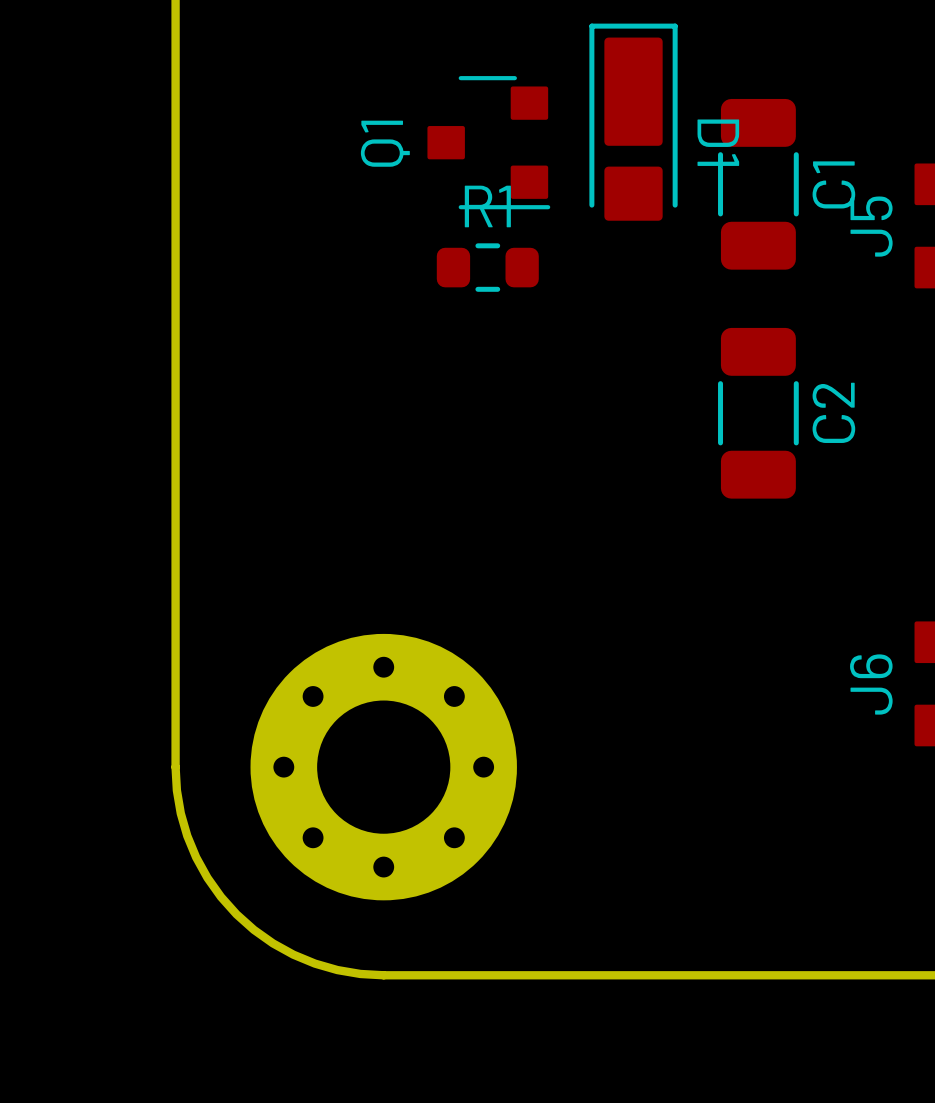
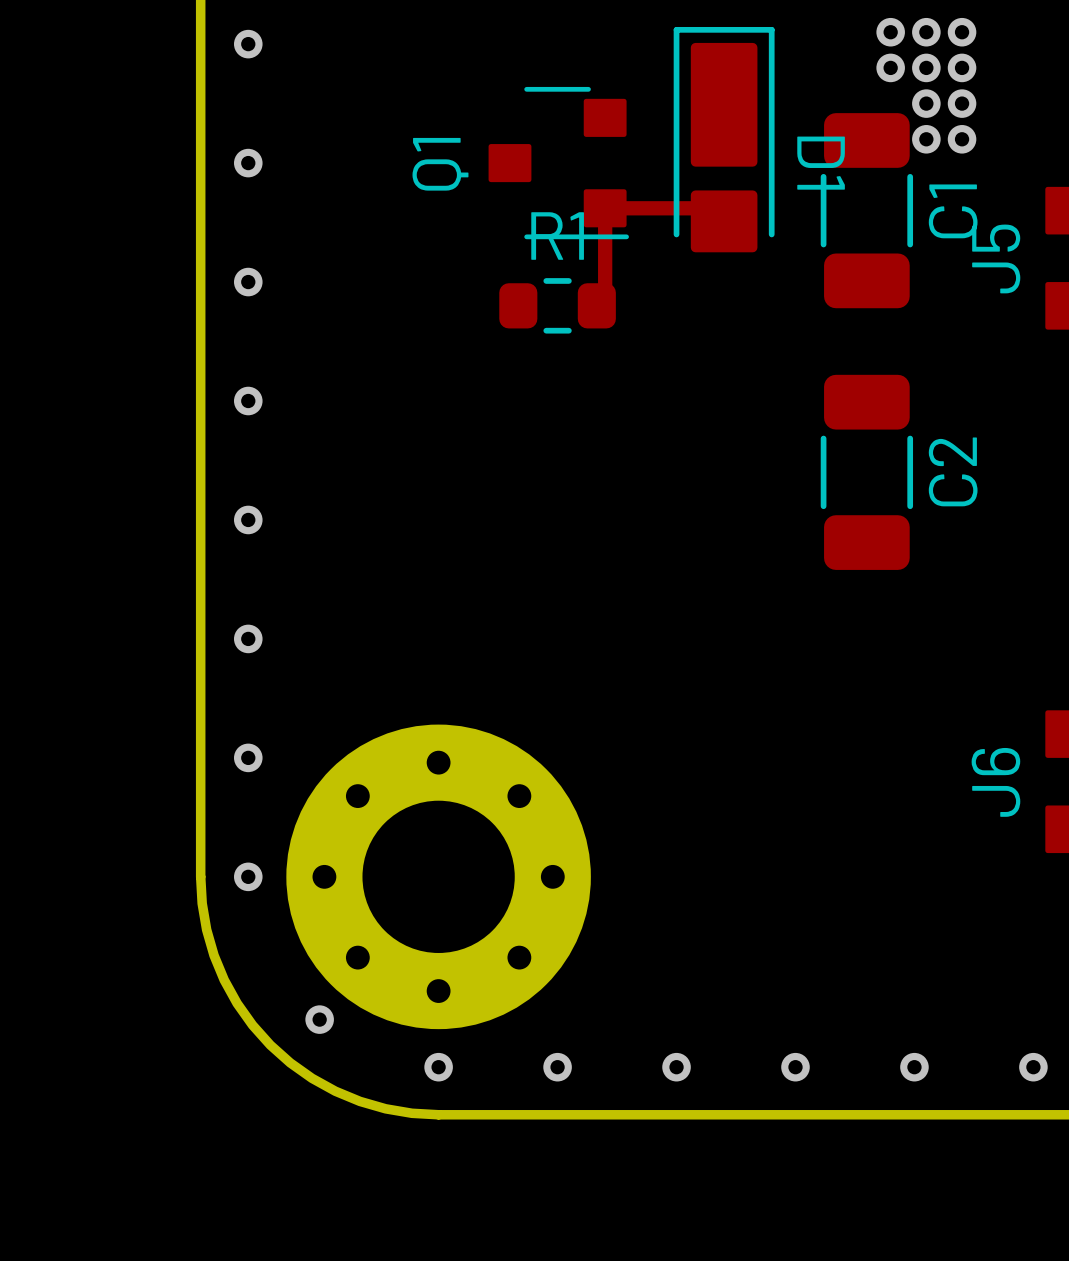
via: none -> (890, 32)
via: none -> (926, 32)
via: none -> (962, 32)
via: none -> (248, 44)
via: none -> (890, 67)
via: none -> (926, 67)
via: none -> (962, 67)
via: none -> (926, 103)
via: none -> (962, 103)
via: none -> (926, 139)
via: none -> (962, 139)
via: none -> (248, 163)
top track: none -> (724, 221) (711, 208) (605, 208) (605, 297) (596, 305)
via: none -> (248, 282)
via: none -> (248, 401)
via: none -> (248, 519)
via: none -> (248, 638)
via: none -> (248, 757)
via: none -> (248, 876)
via: none -> (319, 1019)
via: none -> (438, 1067)
via: none -> (557, 1067)
via: none -> (676, 1067)
via: none -> (795, 1067)
via: none -> (914, 1067)
via: none -> (1033, 1067)

